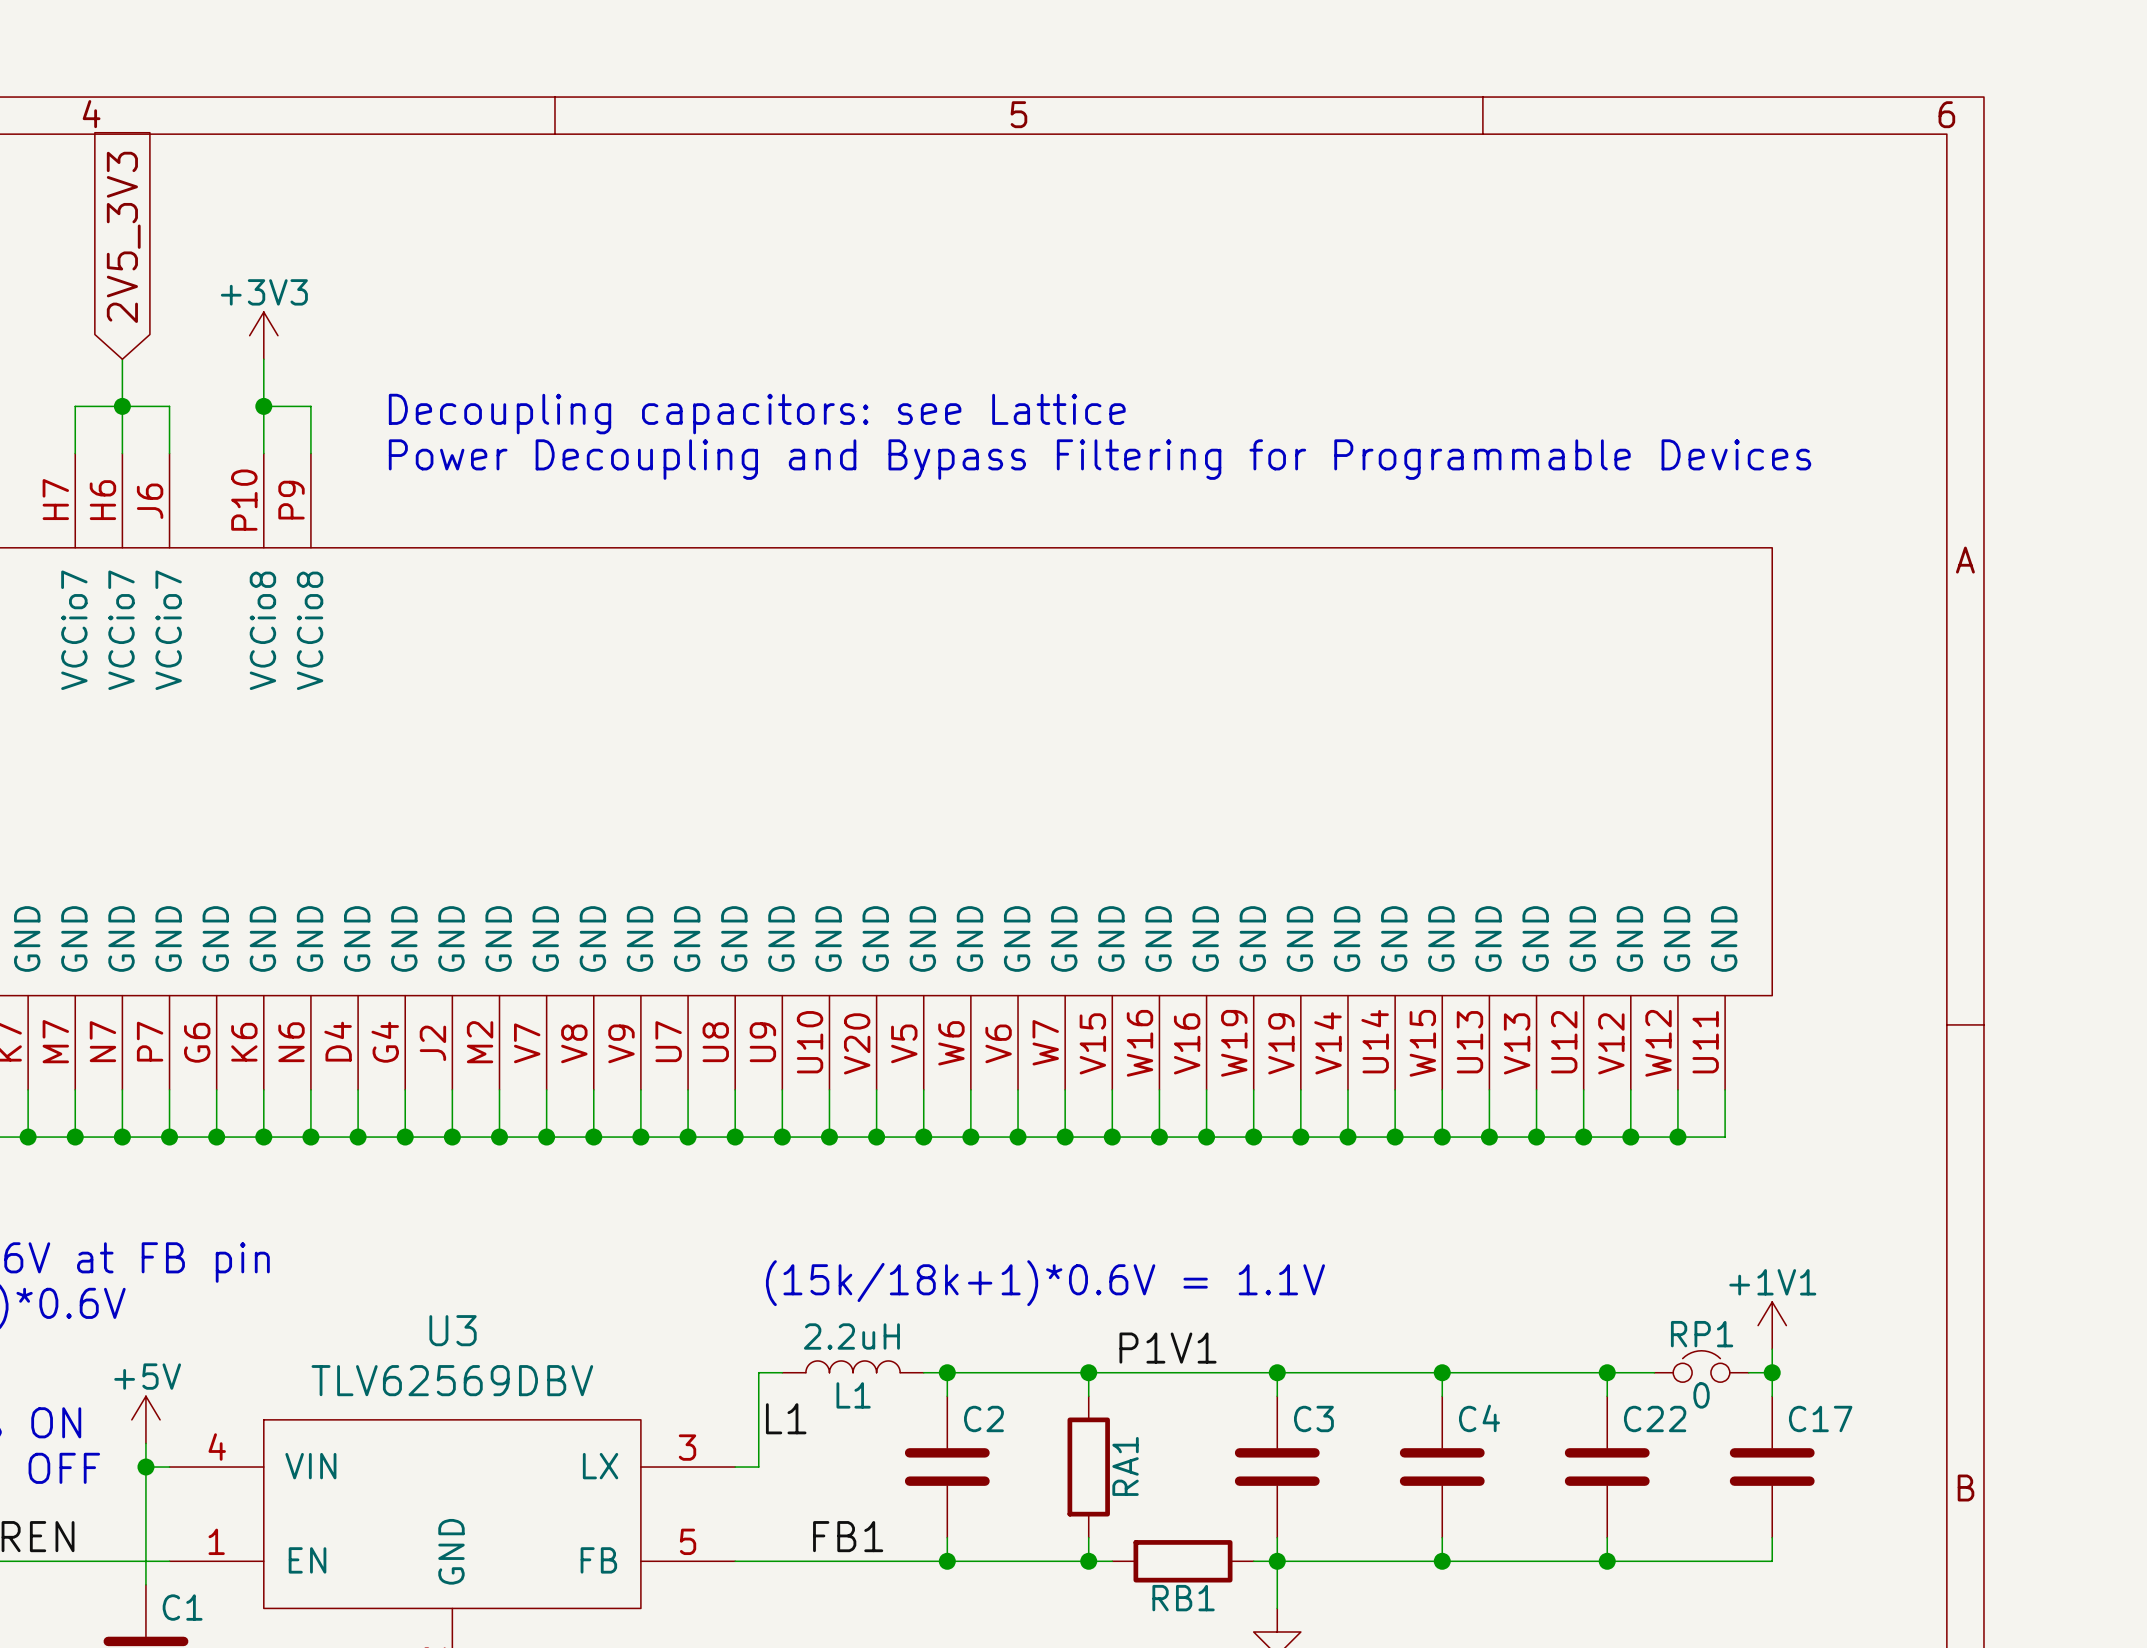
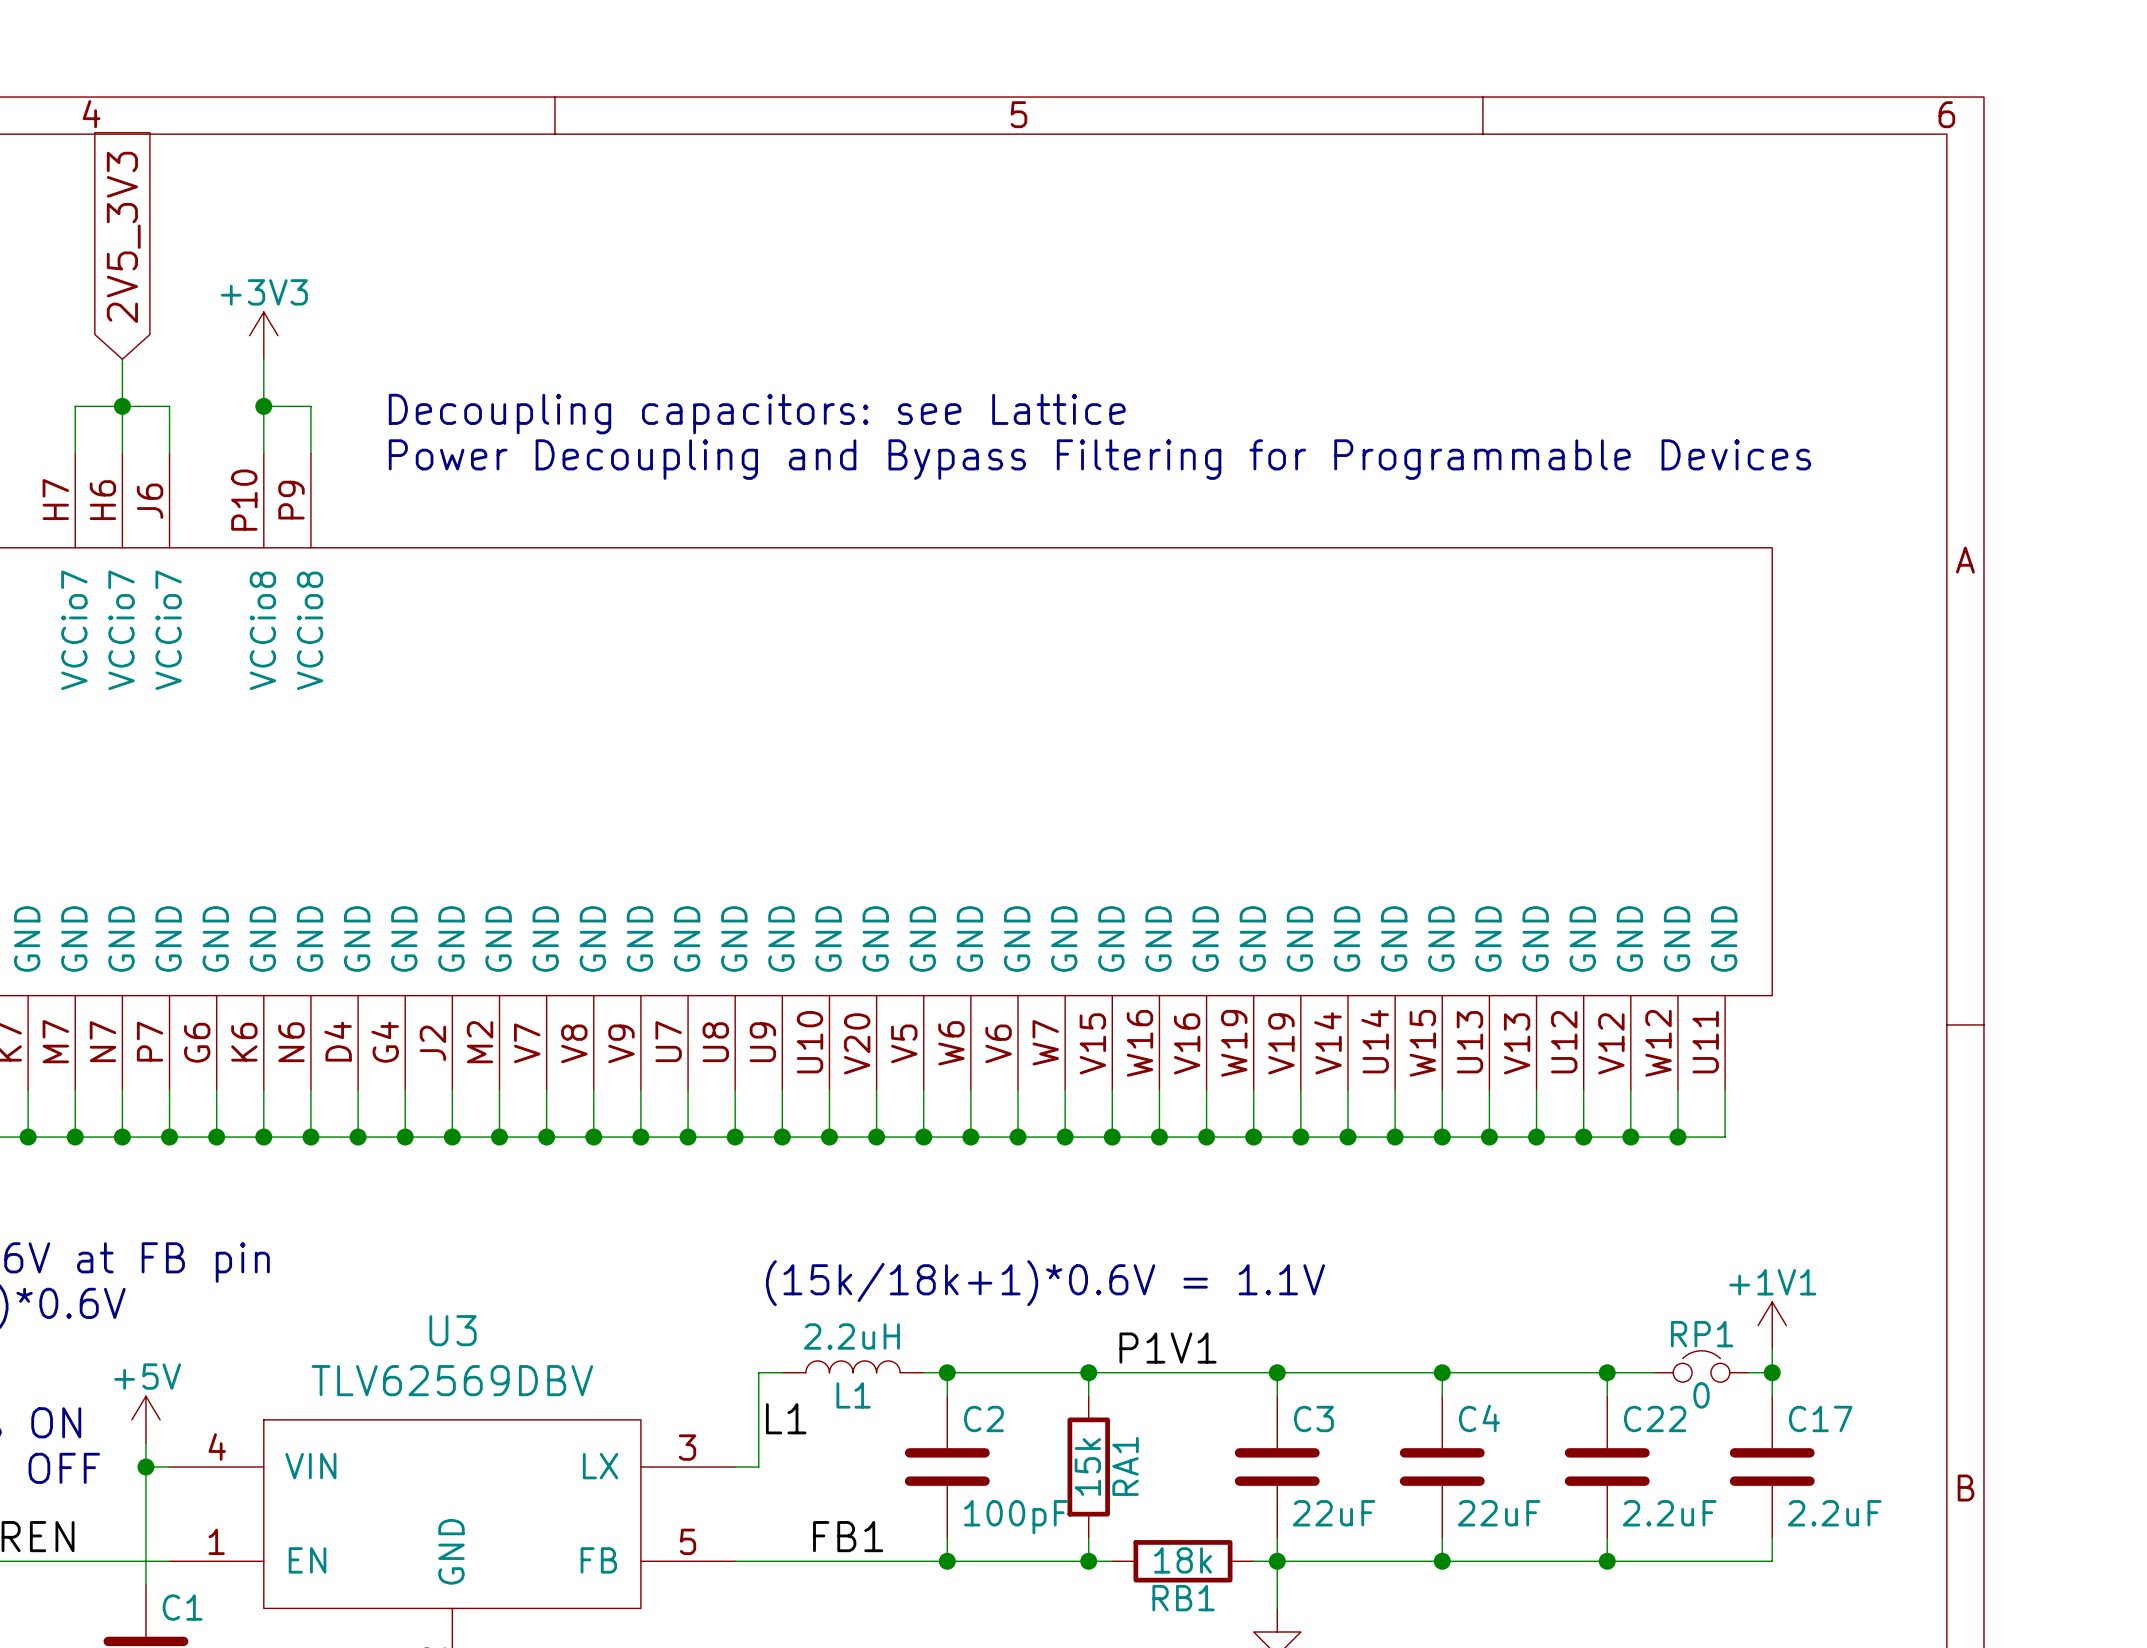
RA1 value: none -> 15k (1087, 1467)
C3 value: none -> 22uF (1334, 1513)
C4 value: none -> 22uF (1499, 1513)
C22 value: none -> 2.2uF (1669, 1513)
C17 value: none -> 2.2uF (1834, 1513)
C2 value: none -> 100pF (1015, 1517)
RB1 value: none -> 18k (1183, 1560)

